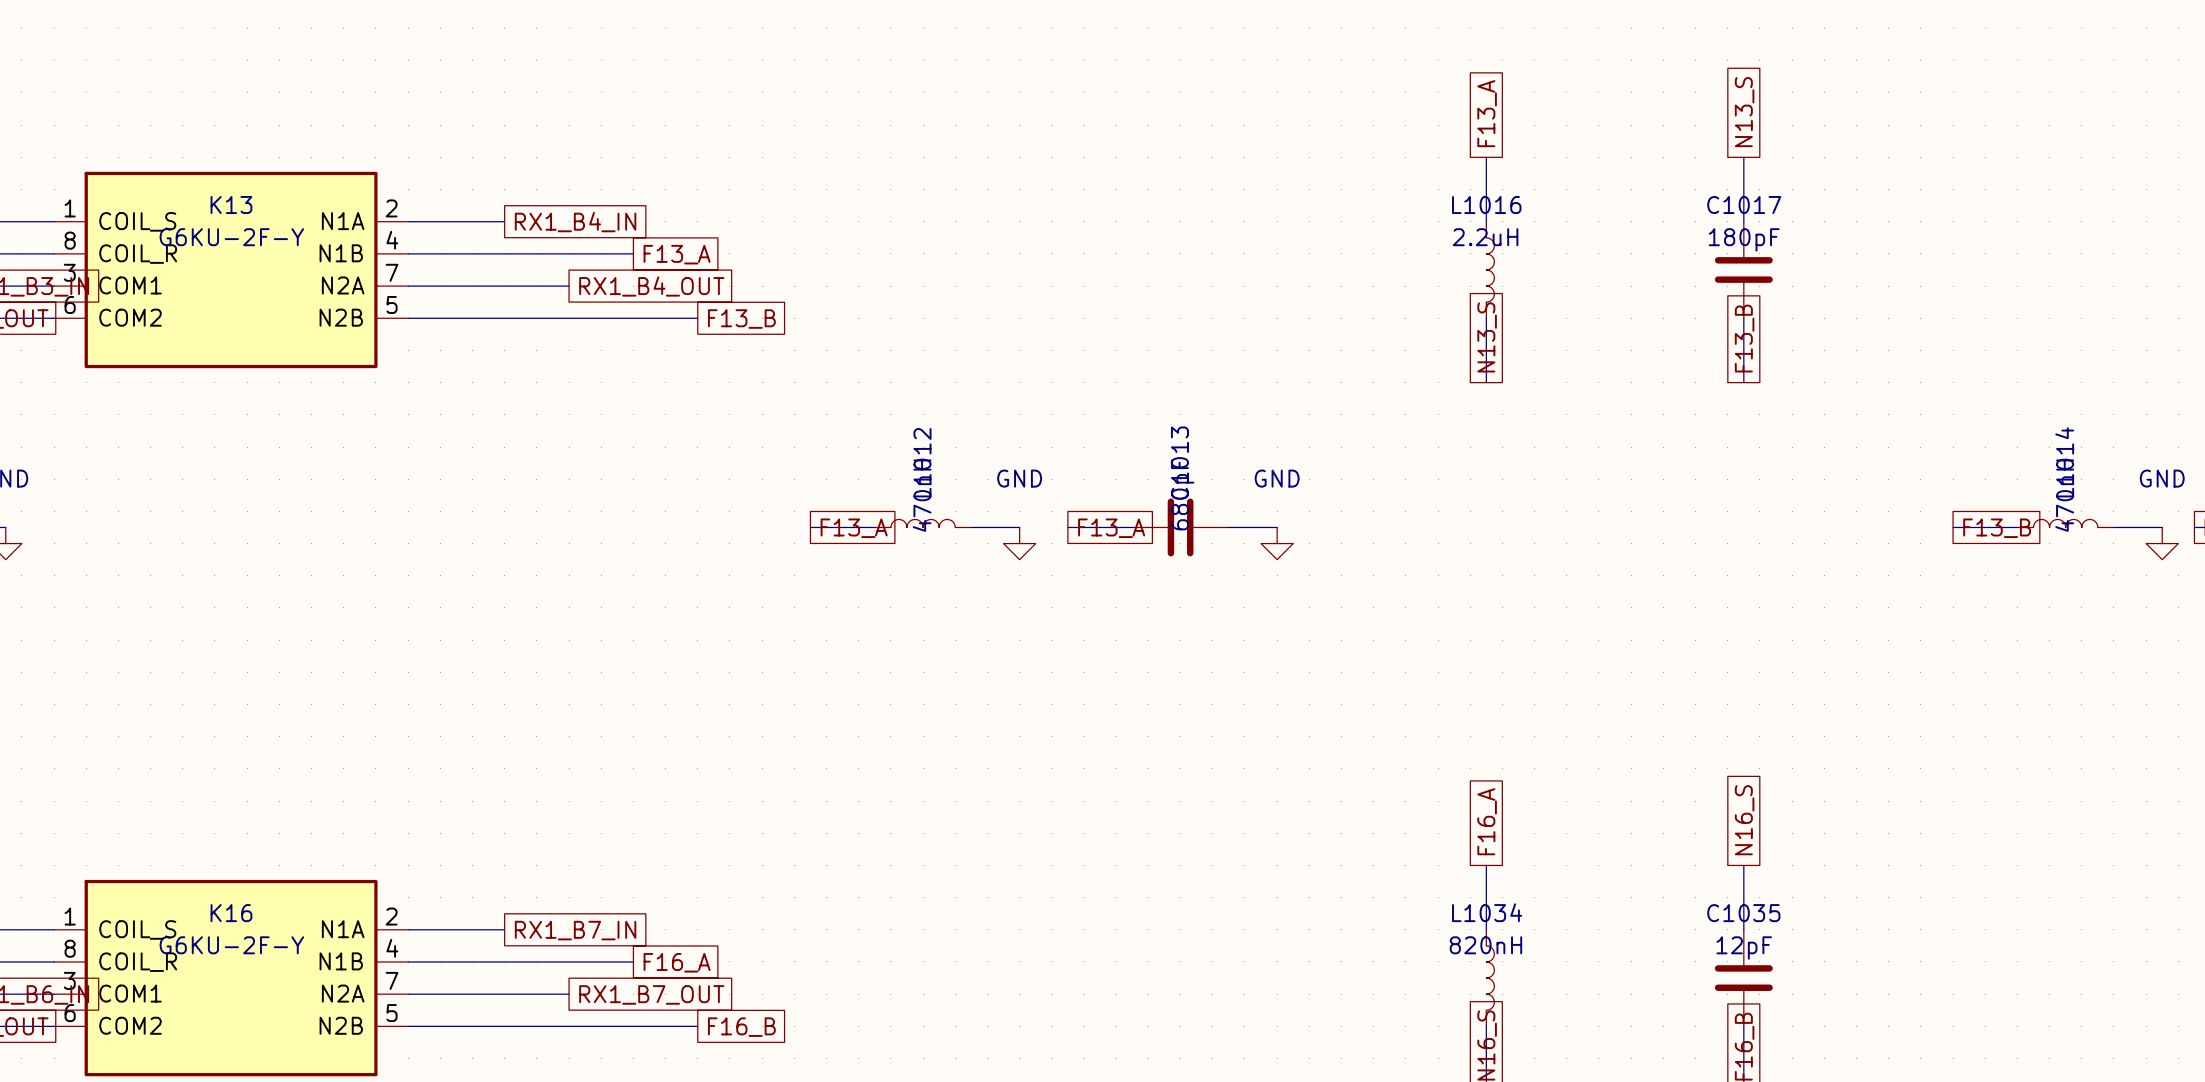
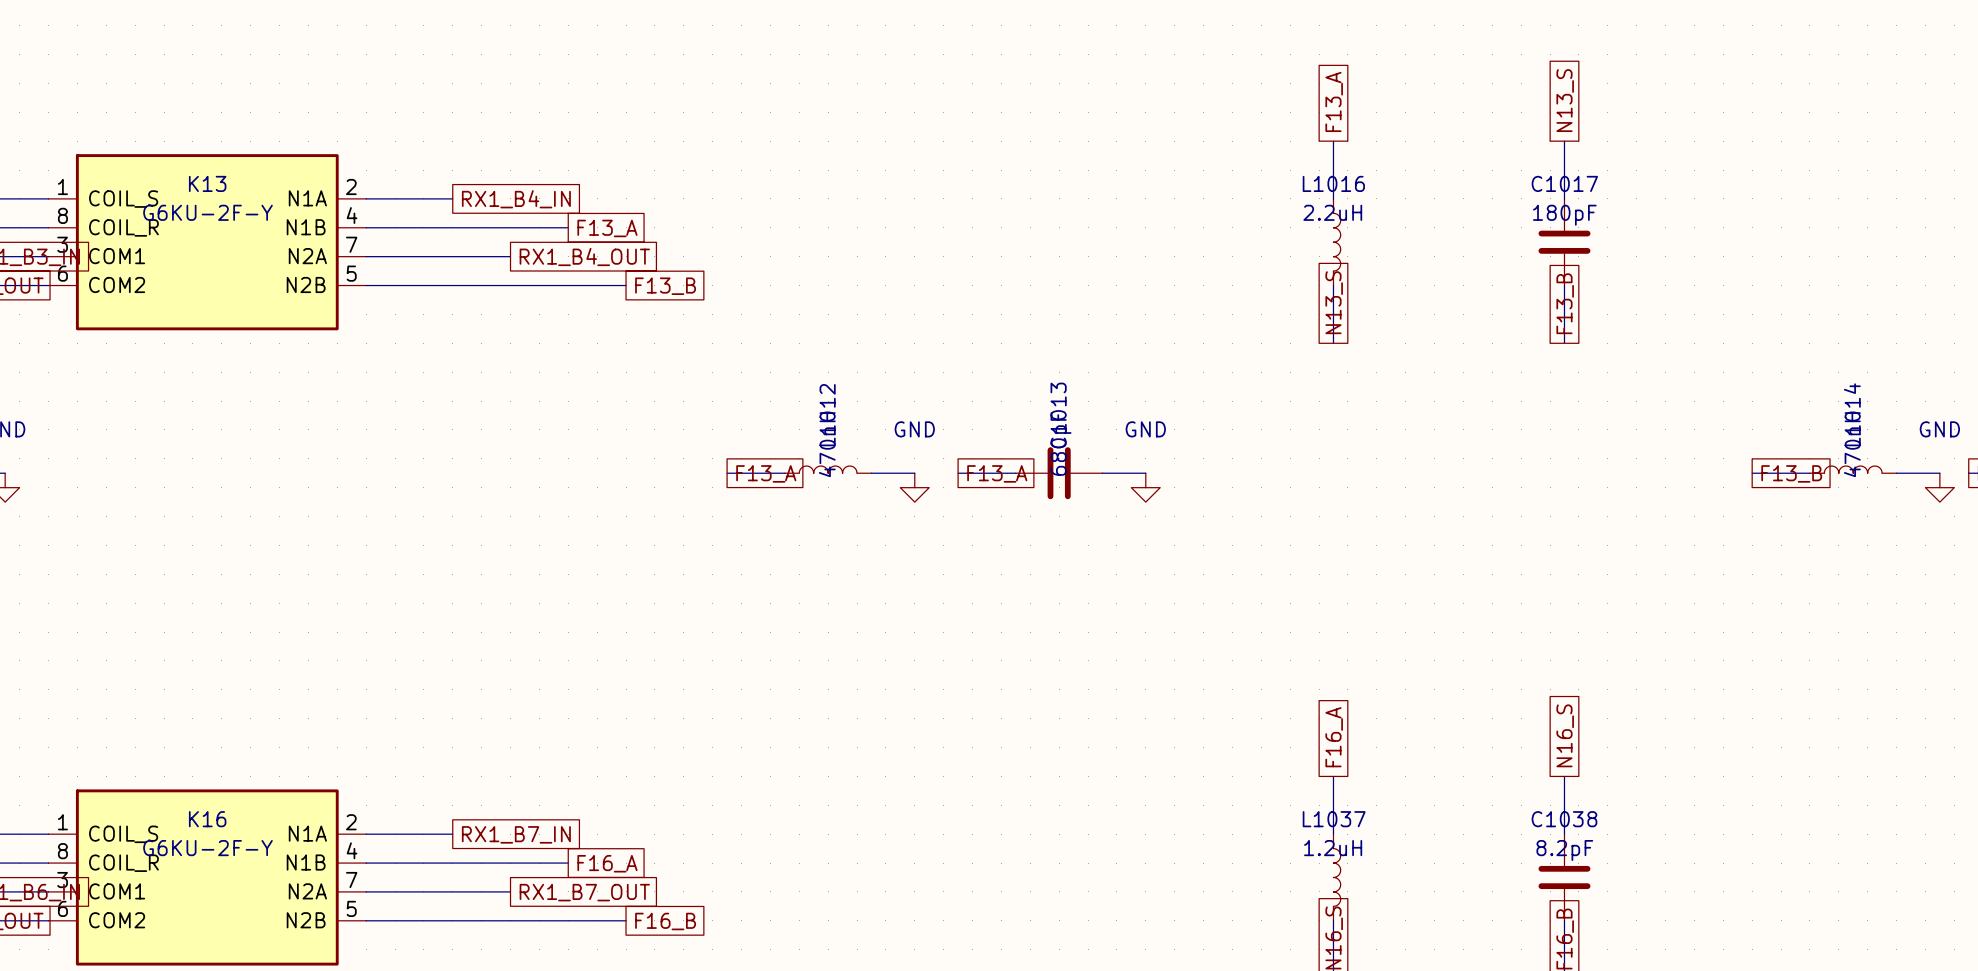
L1034 name: L1034 (1487, 912) -> L1037 (1334, 819)
C1035 name: C1035 (1743, 913) -> C1038 (1564, 819)
L1034 value: 820nH (1485, 945) -> 1.2uH (1333, 848)
C1035 value: 12pF (1744, 947) -> 8.2pF (1564, 850)

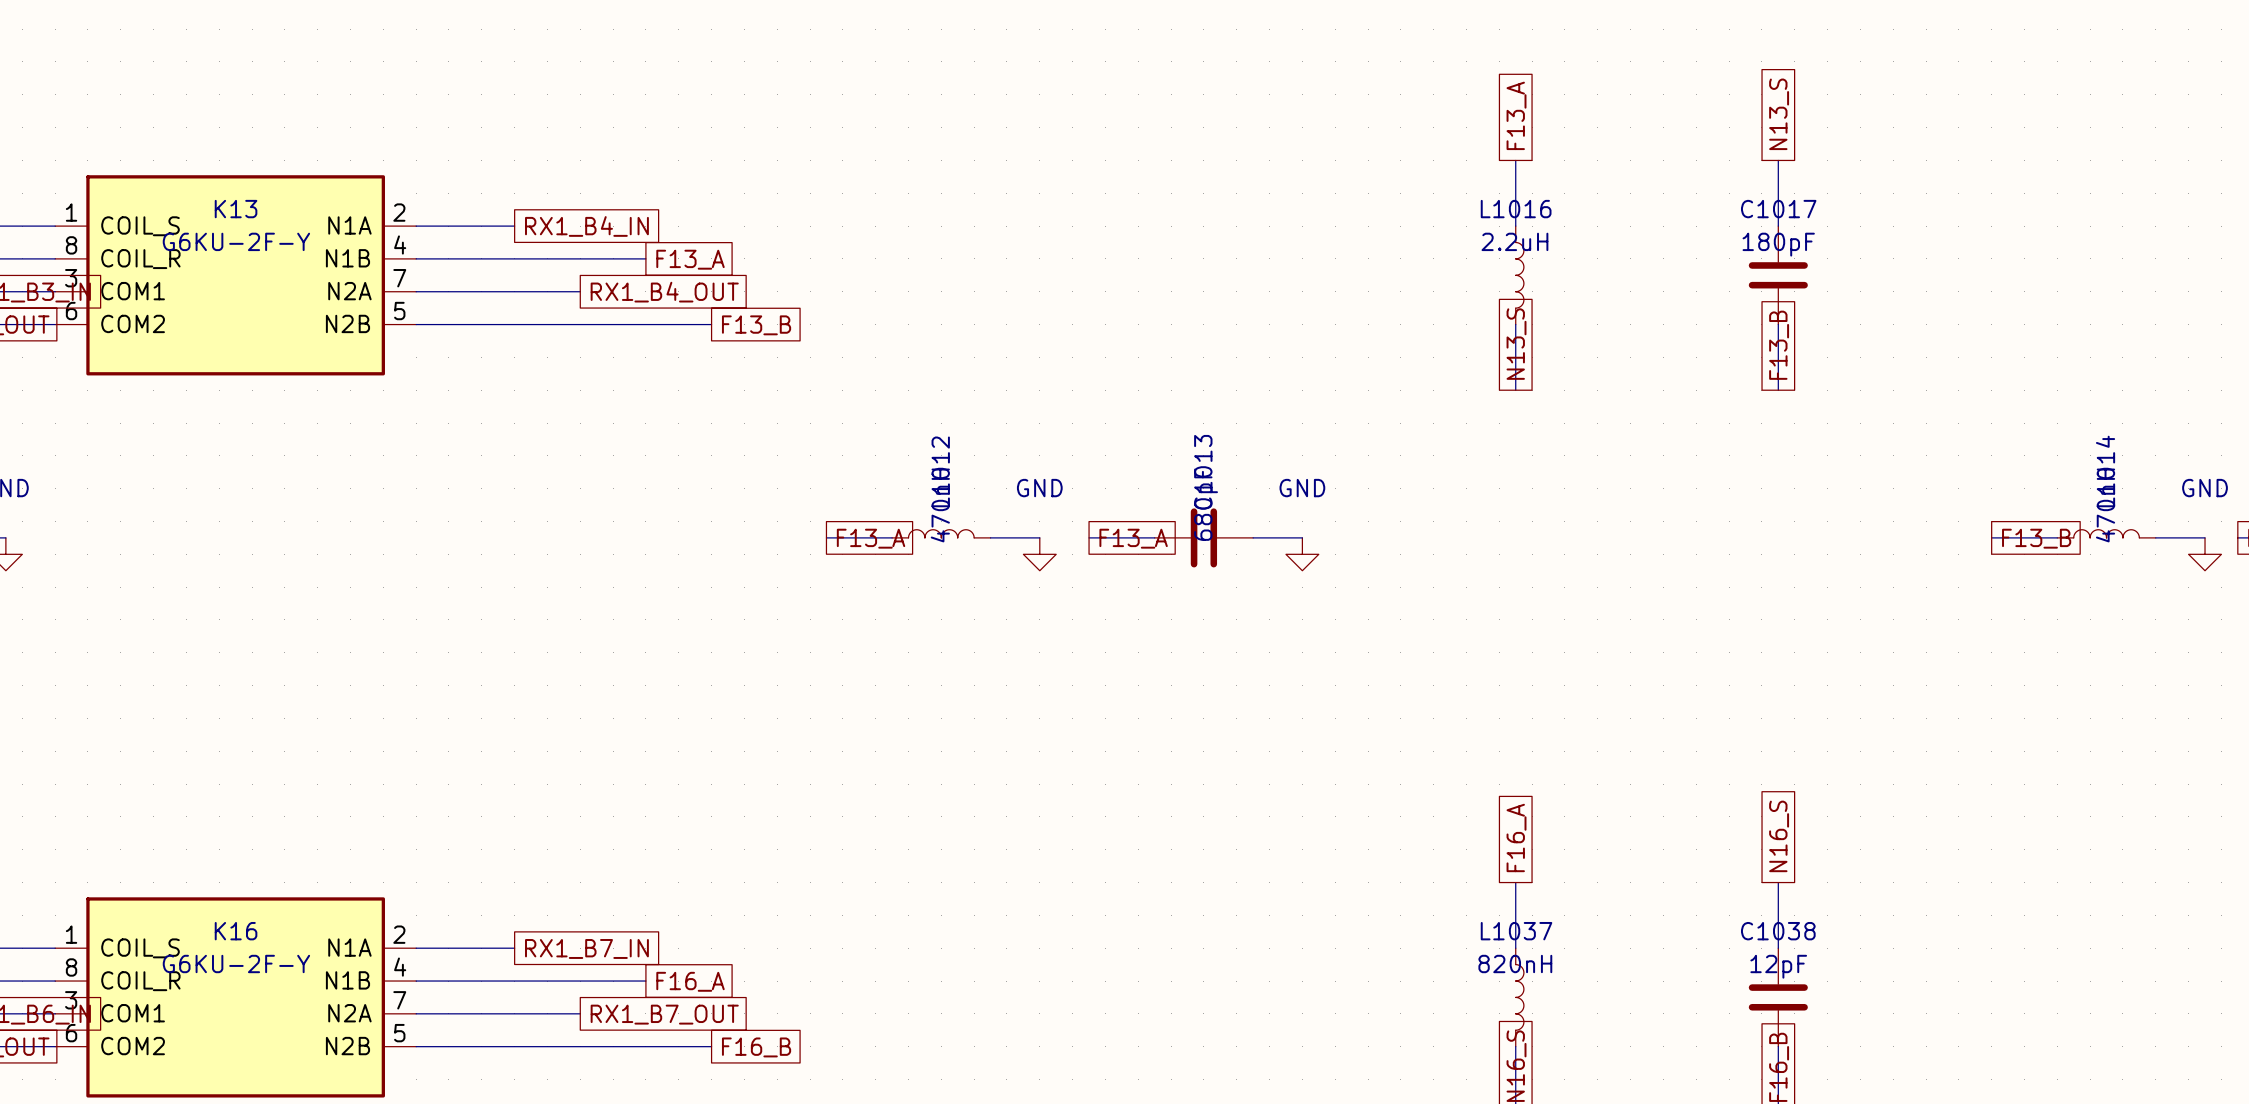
L1037 value: 1.2uH (1333, 848) -> 820nH (1515, 963)
C1038 value: 8.2pF (1564, 850) -> 12pF (1778, 966)

